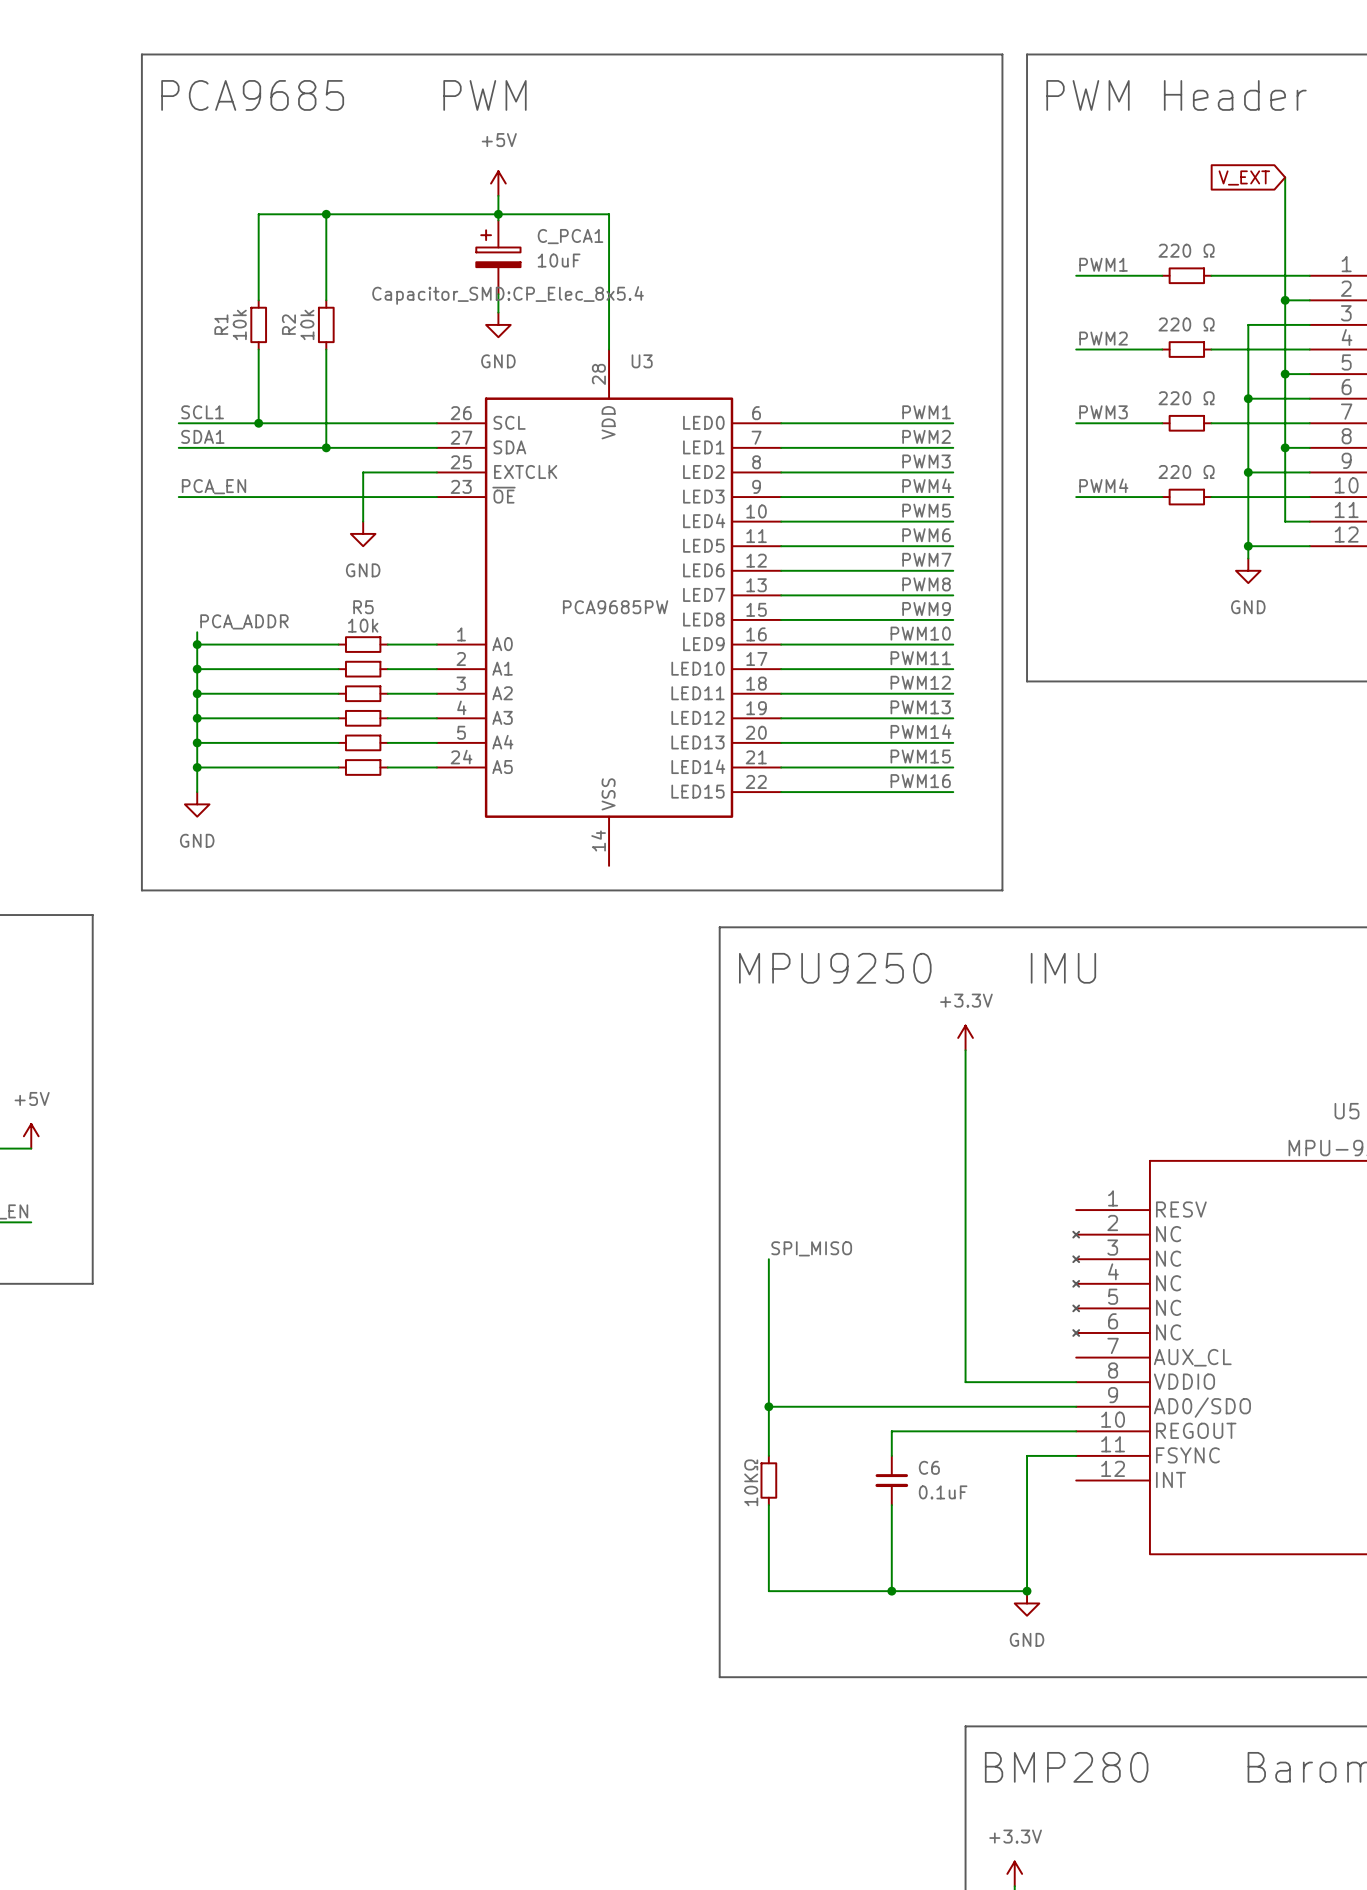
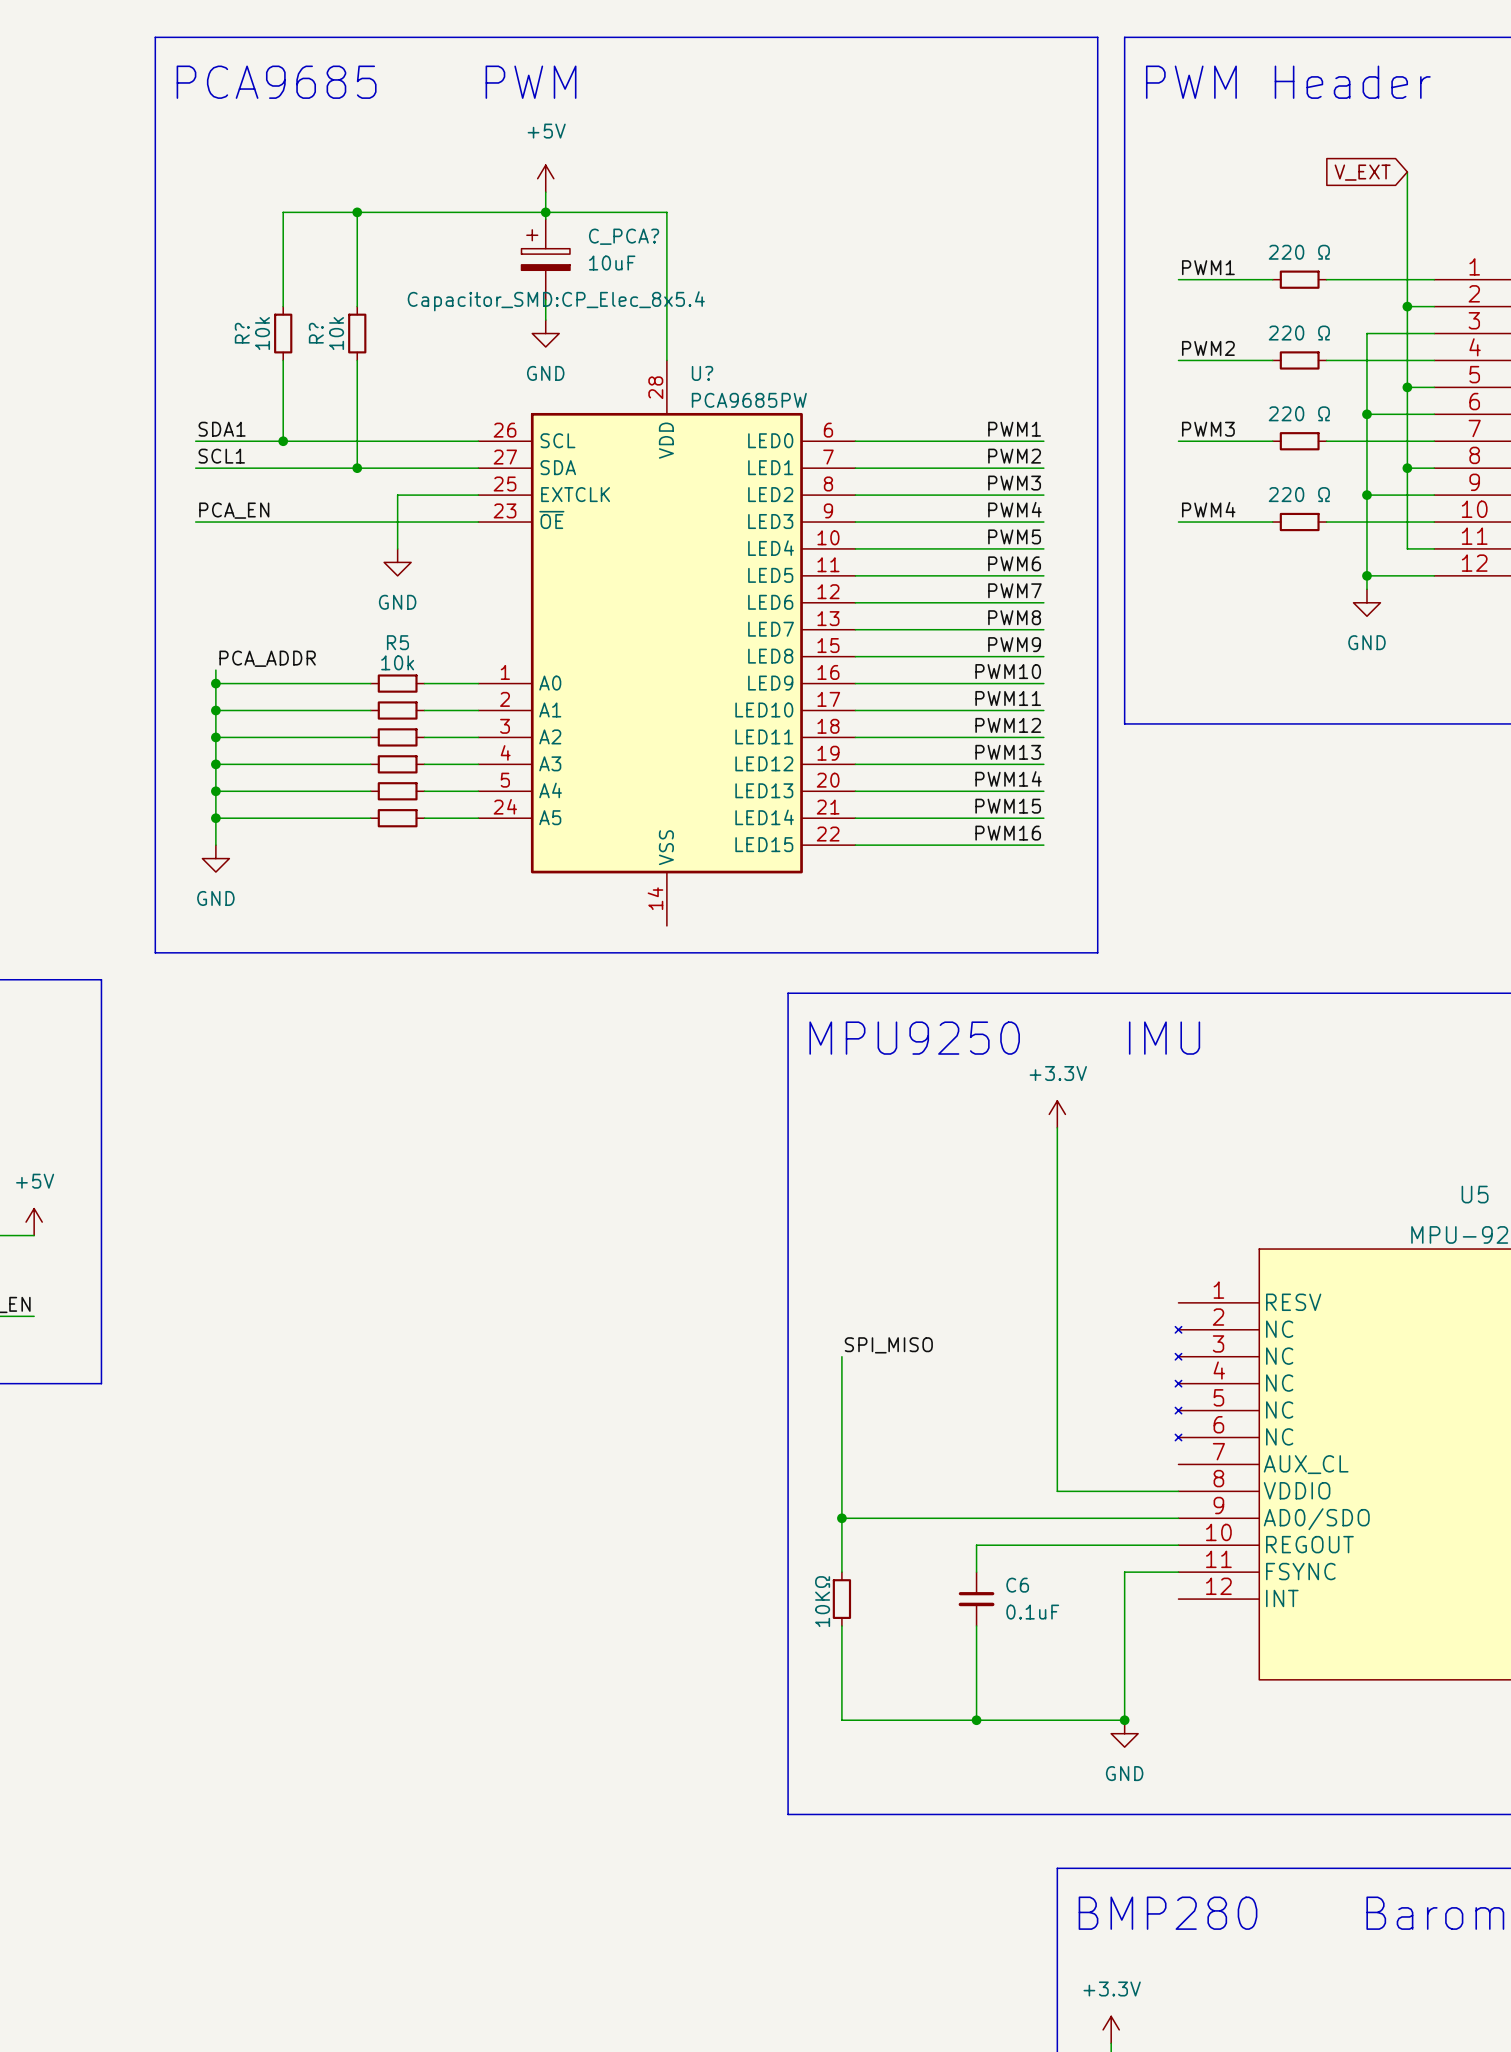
C_PCA1 name: C_PCA1 (570, 236) -> C_PCA? (624, 236)
R1 name: R1 (221, 324) -> R? (242, 333)
R2 name: R2 (288, 324) -> R? (316, 333)
U3 name: U3 (642, 361) -> U? (702, 373)
label: SCL1 (202, 412) -> SDA1 (222, 429)
label: SDA1 (202, 436) -> SCL1 (221, 456)
U3 value position: PCA9685PW (615, 607) -> PCA9685PW (749, 400)

